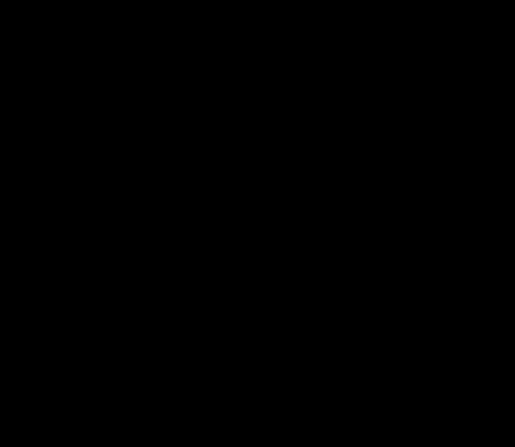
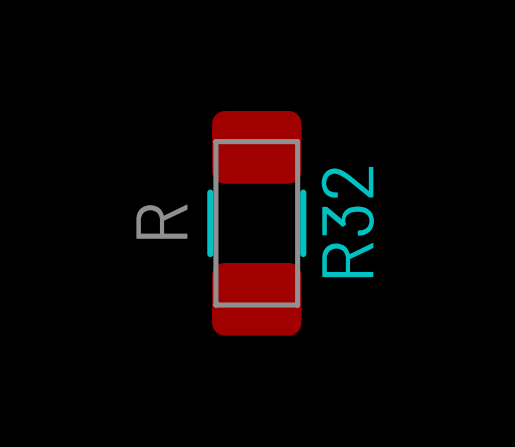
R32: none -> R (256, 223)

